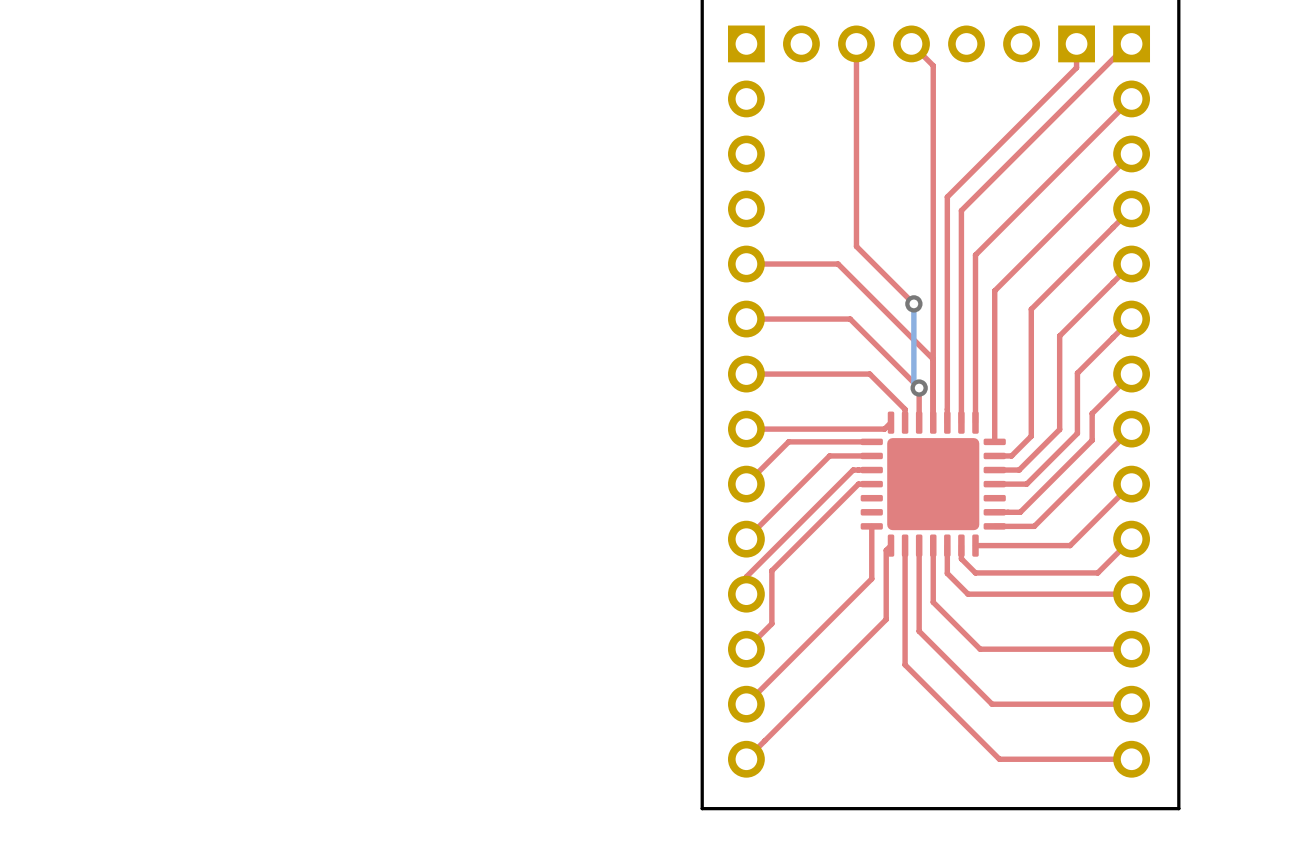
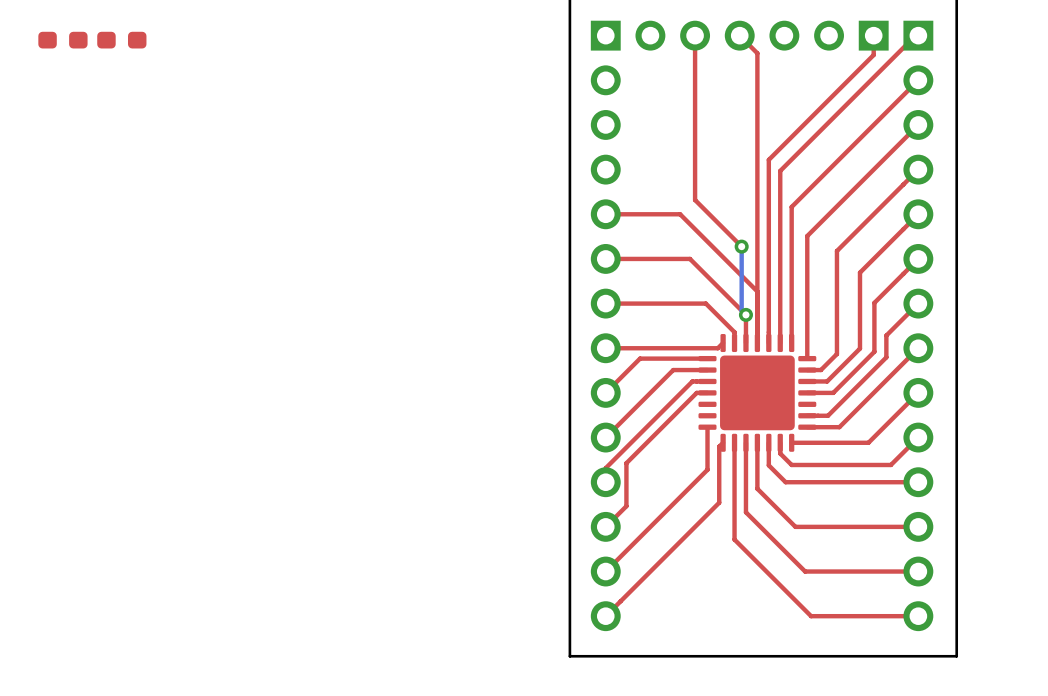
part: none -> (62, 40)
part: none -> (121, 40)

